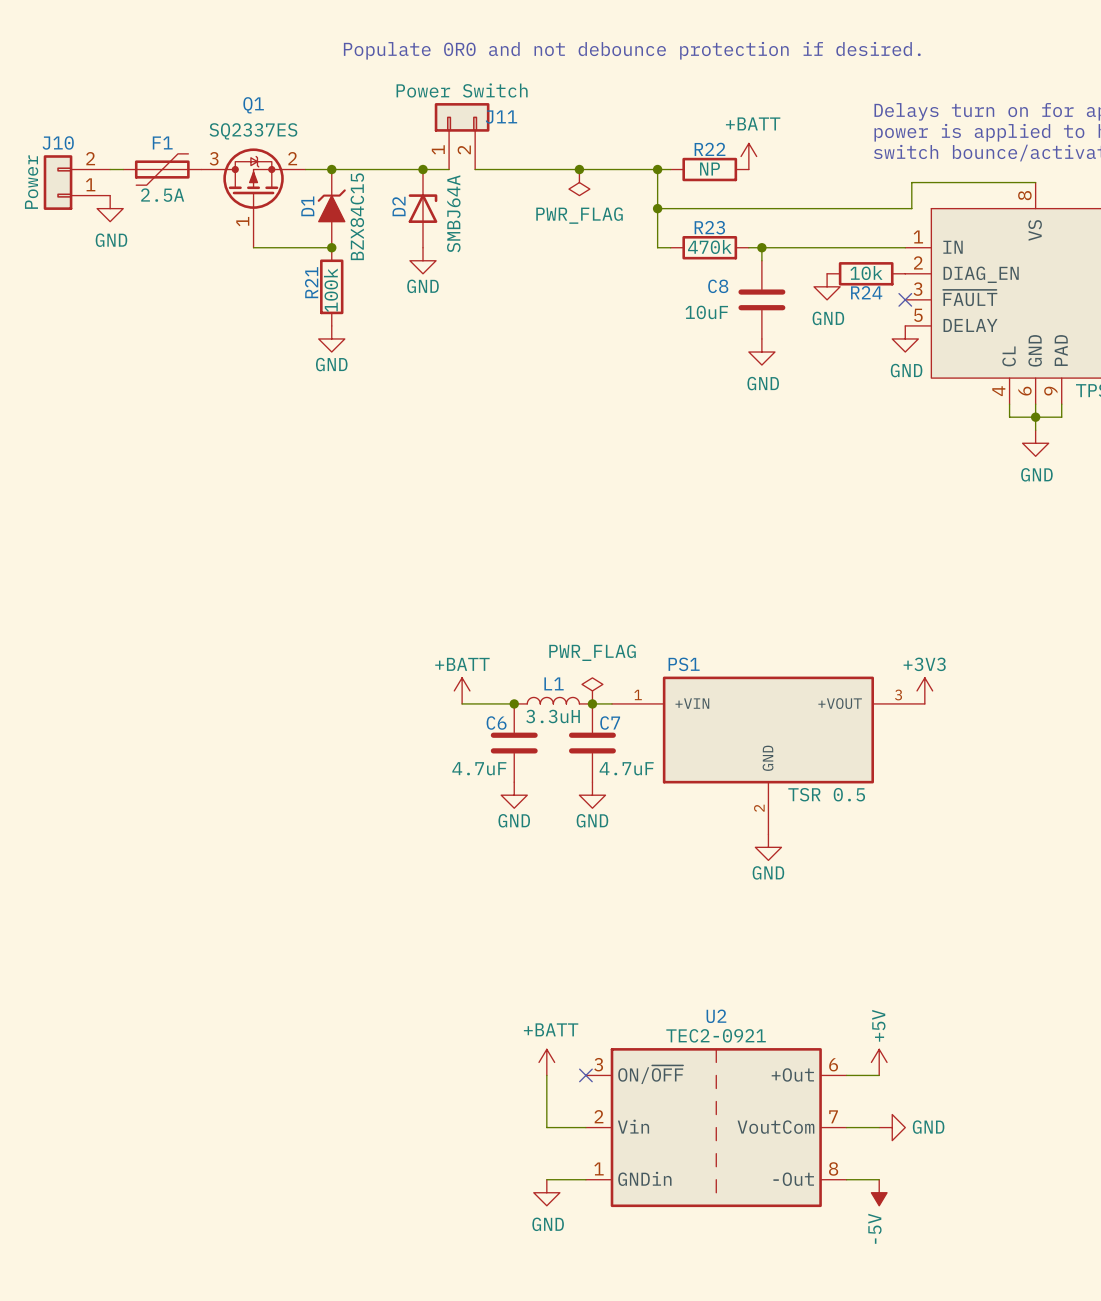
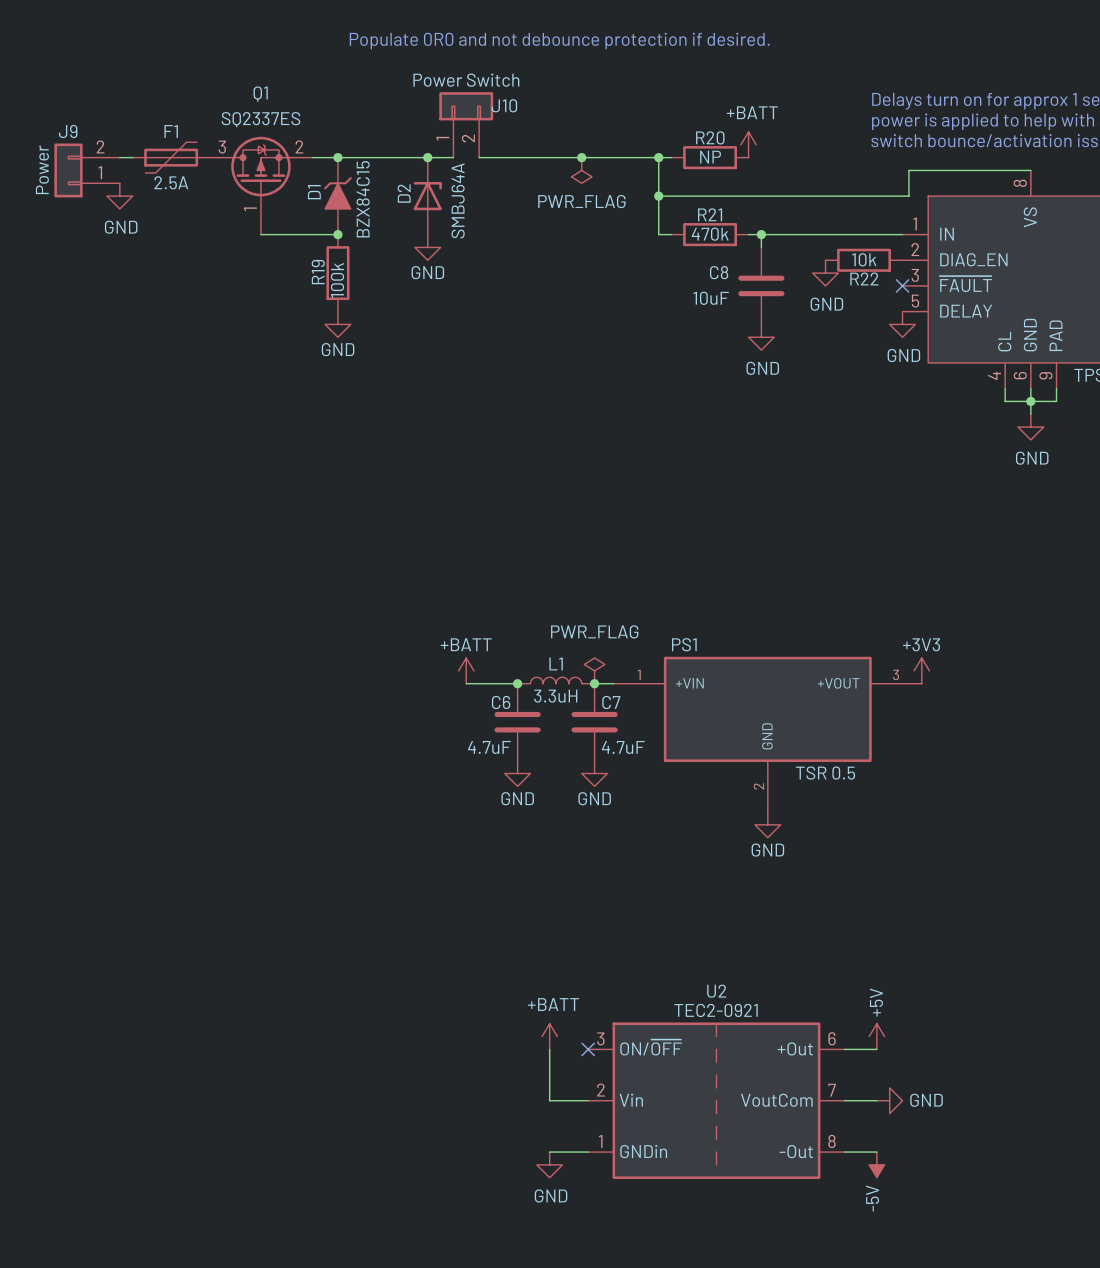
J11 name: J11 (501, 117) -> J10 (504, 105)
J10 name: J10 (58, 142) -> J9 (68, 131)
R22 name: R22 (710, 149) -> R20 (710, 137)
R23 name: R23 (709, 227) -> R21 (710, 214)
R21 name: R21 (311, 282) -> R19 (318, 272)
R24 name: R24 (866, 292) -> R22 (864, 278)

